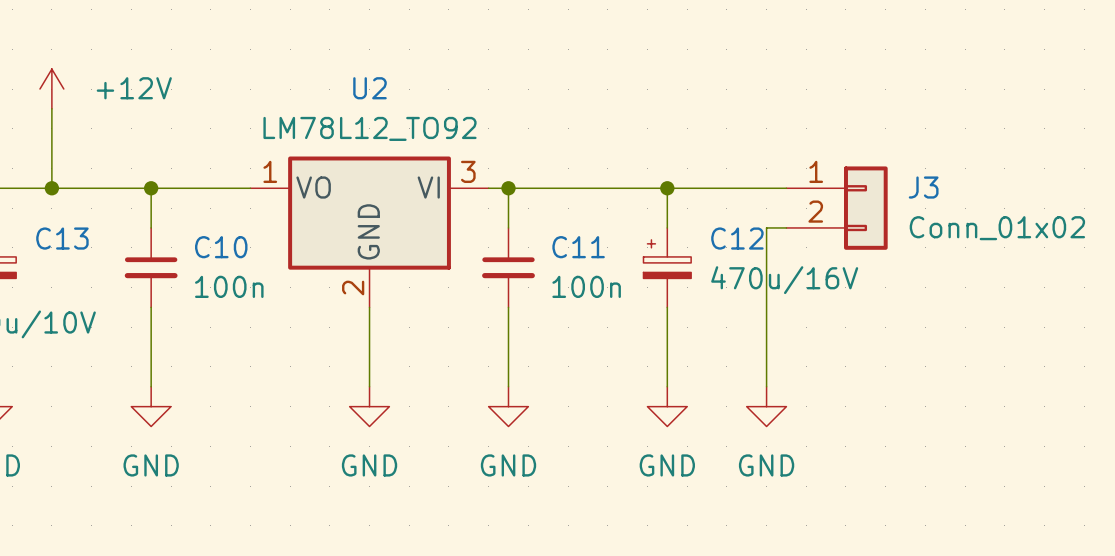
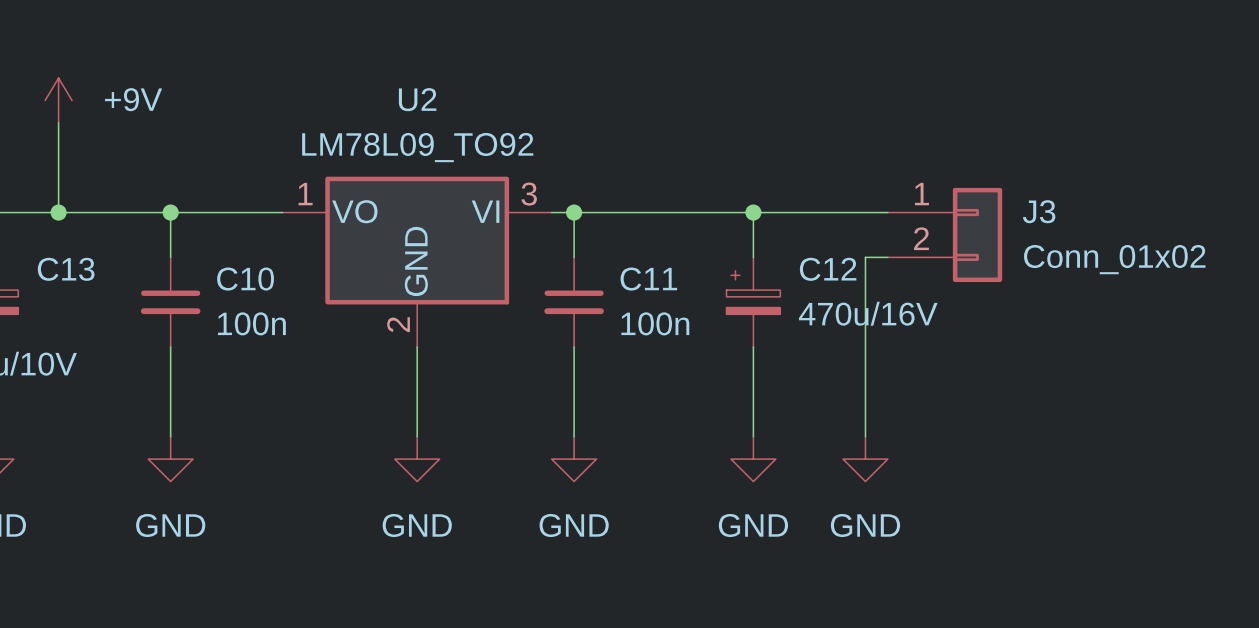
power symbol: +12V (51, 89) -> +9V (58, 100)
U2 value: LM78L12_TO92 (370, 128) -> LM78L09_TO92 (417, 147)

